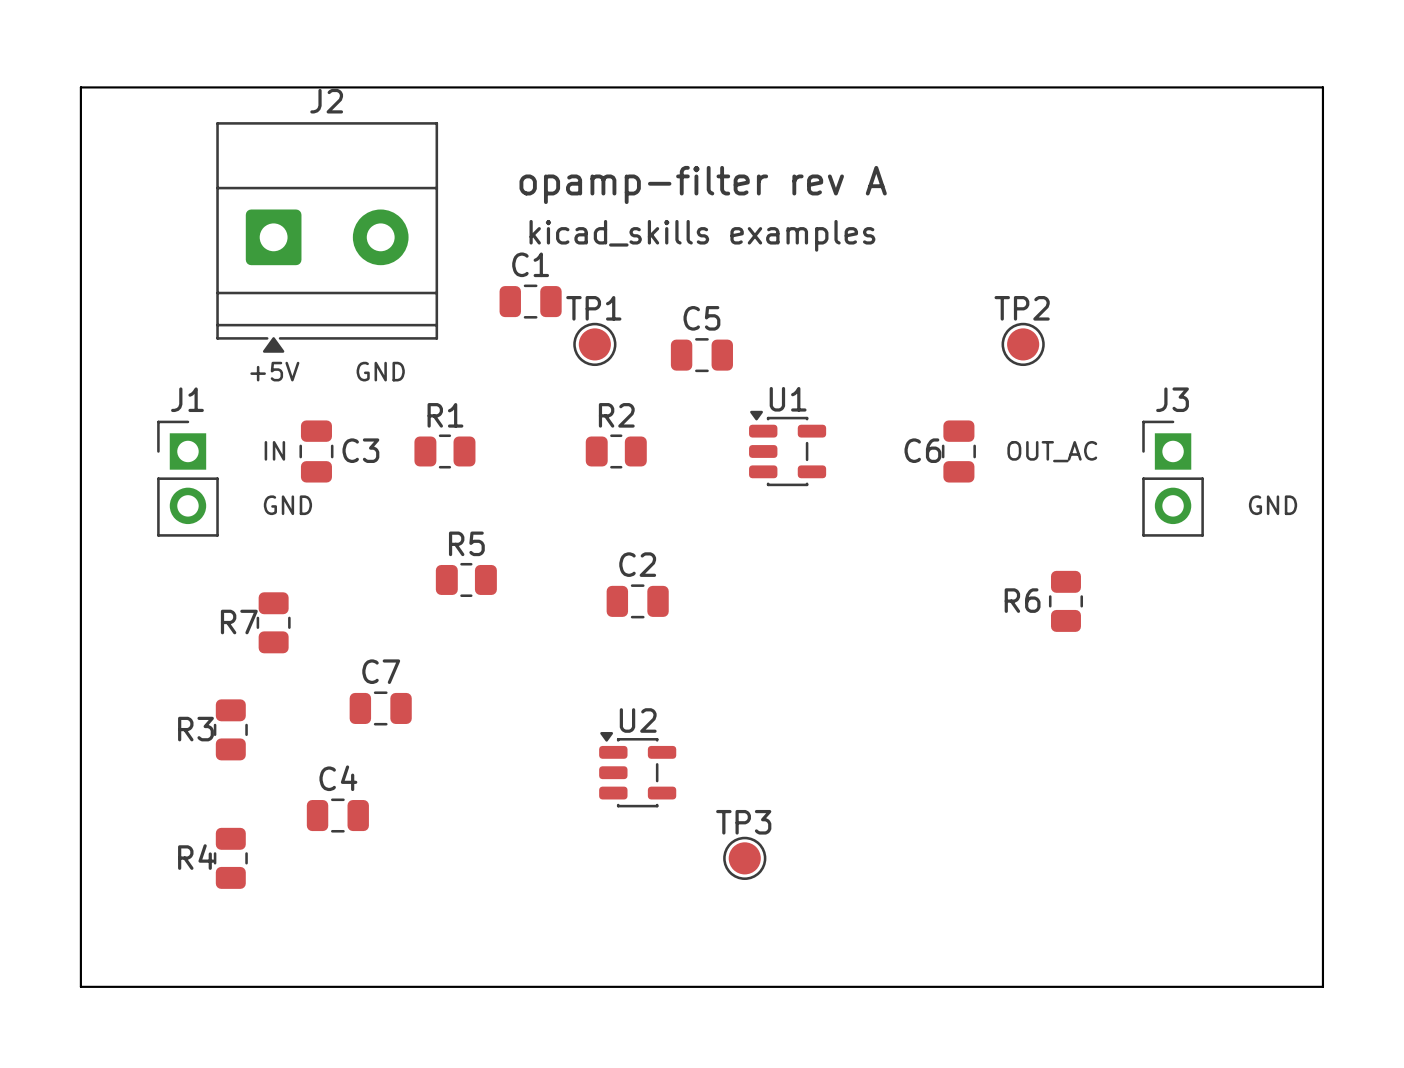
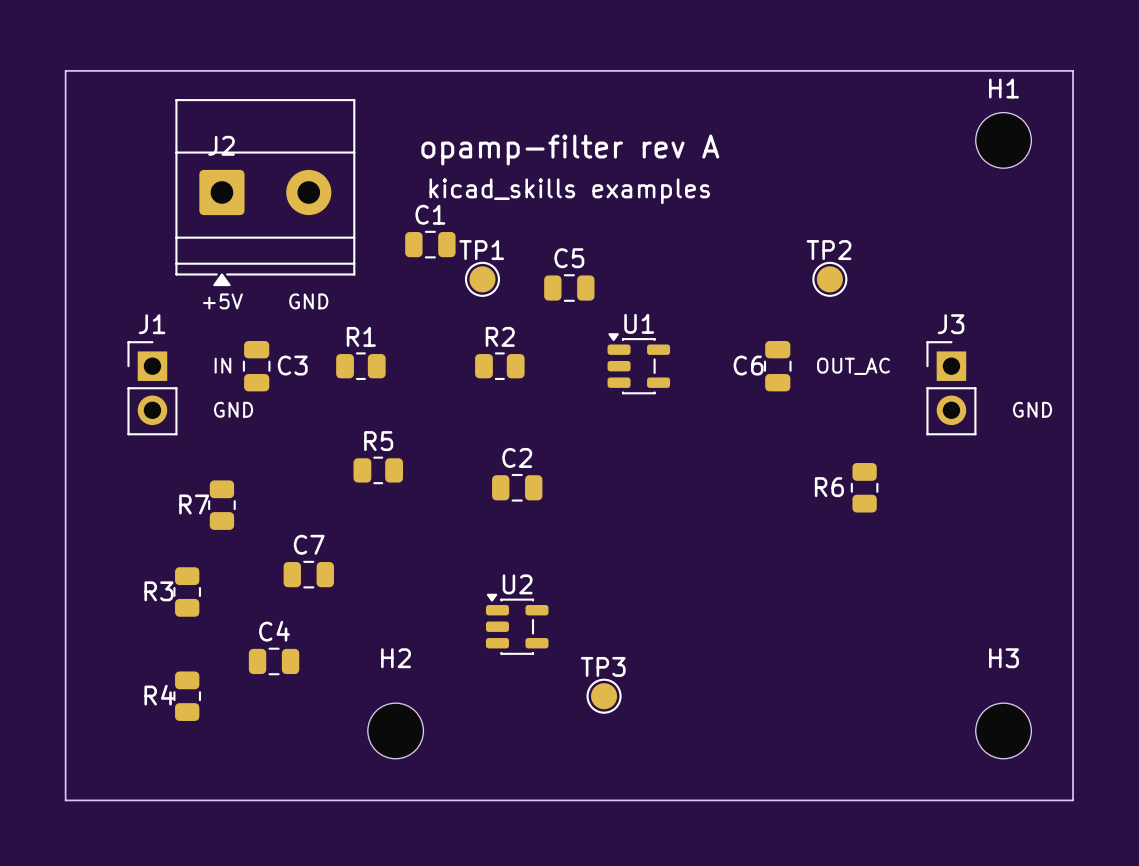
J2 name position: J2 (326, 101) -> J2 (221, 145)
H1: none -> (1003, 140)
H2: none -> (395, 730)
H3: none -> (1003, 730)

